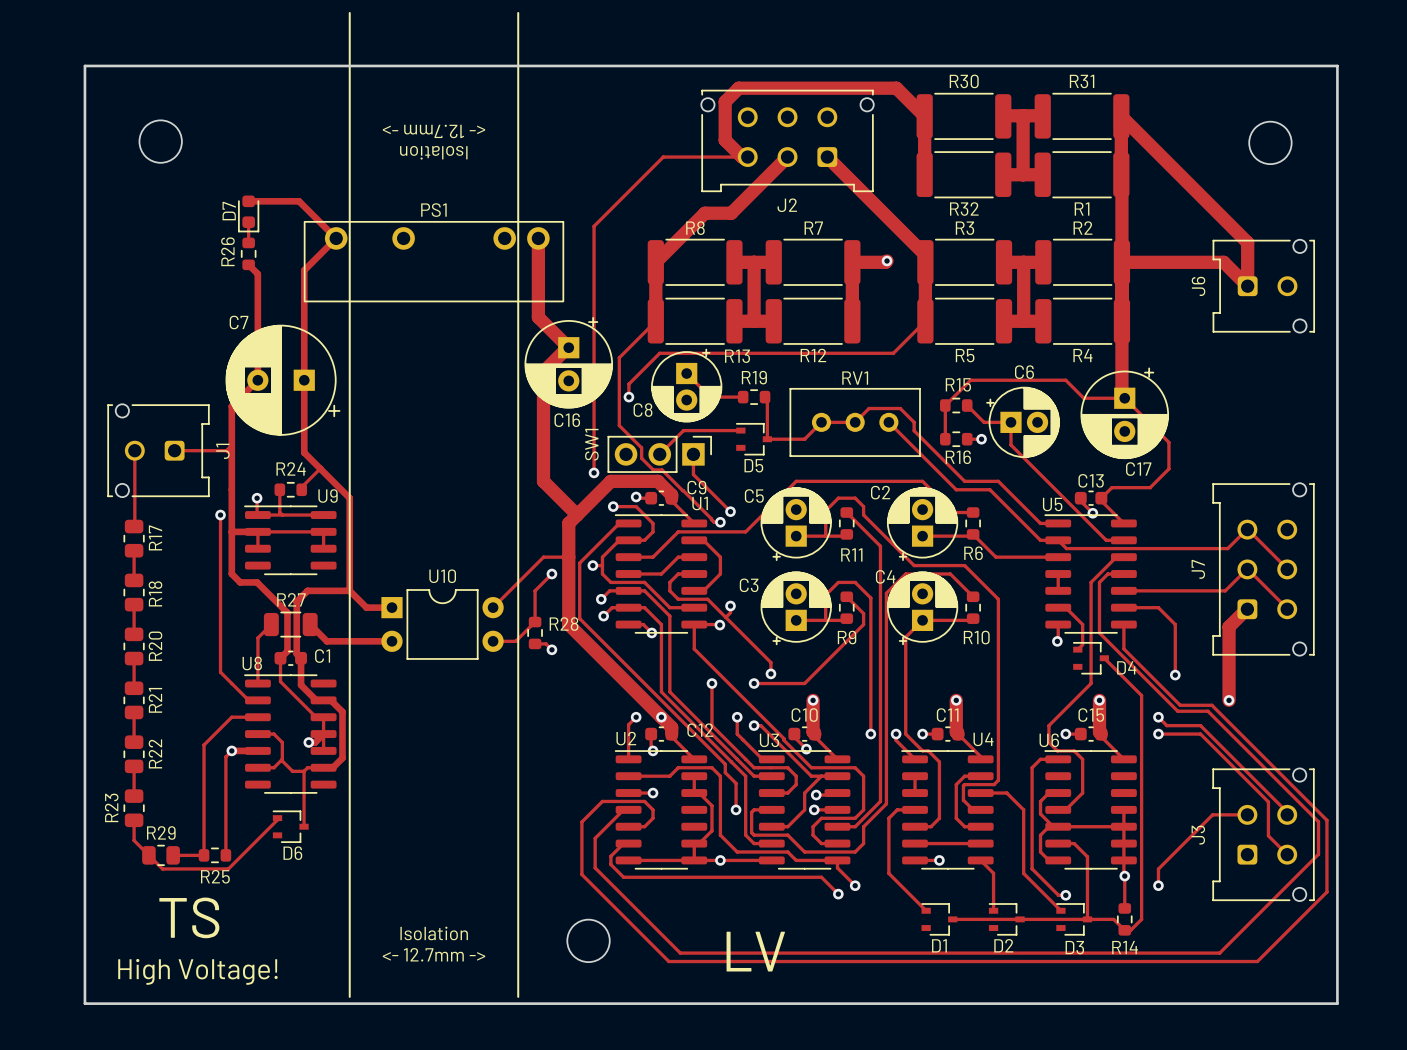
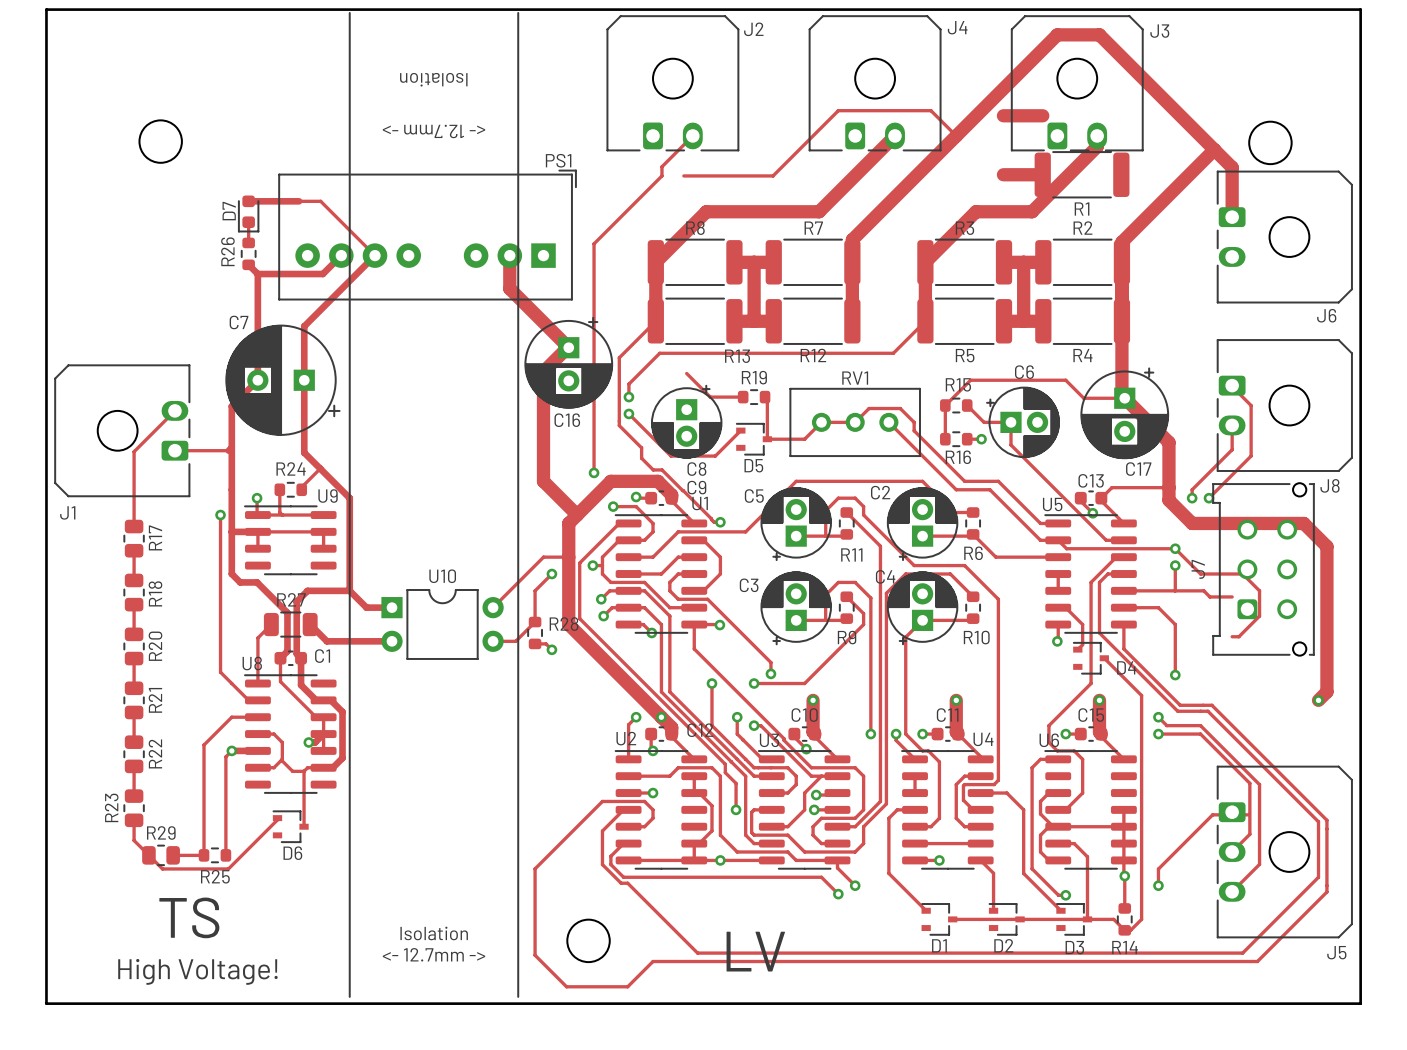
J4: none -> (875, 83)
J2 footprint: [701, 89, 874, 193] -> [606, 15, 740, 152]
track: (1023, 115) (1023, 174) -> none
R30: (963, 116) -> none
R31: (1082, 116) -> none
track: none -> (956, 135) (931, 110) (838, 110) (773, 175) (683, 175)
text position: Isolation (433, 152) -> Isolation (433, 79)
track: (787, 157) (731, 213) (704, 213) -> (894, 135) (819, 211) (704, 213)
track: (827, 157) (925, 255) (925, 262) -> (1097, 135) (1097, 146) (1032, 211) (975, 211) (925, 262)
track: (924, 174) (924, 116) (896, 88) (738, 88) (725, 101) (725, 140) (741, 157) (747, 157) (663, 157) (594, 226) (594, 243) -> (692, 135) (661, 166) (661, 175) (594, 243)
R32: (963, 174) -> none
track: (299, 201) (336, 238) (304, 270) (304, 326) -> (299, 201) (320, 201) (375, 255) (304, 326)
J2 name position: J2 (787, 205) -> J2 (753, 29)
PS1 name position: PS1 (433, 210) -> PS1 (558, 160)
PS1 footprint: [303, 221, 565, 303] -> [278, 169, 577, 301]
track: (538, 238) (538, 317) -> (509, 255) (509, 288) (538, 317)
J6 footprint: [1212, 239, 1315, 333] -> [1216, 170, 1353, 304]
track: (1121, 242) (1121, 116) (1247, 242) (1247, 286) (1223, 262) (1121, 262) -> (1121, 242) (1214, 149)
track: none -> (341, 255) (322, 274) (257, 274)
track: (887, 260) (852, 262) -> (1232, 217) (1232, 167) (1099, 34) (1057, 34) (852, 239) (852, 262)
via: (887, 260) -> none
J6 name position: J6 (1198, 286) -> J6 (1326, 315)
C8 position: (686, 385) -> (686, 421)
track: none -> (1232, 385) (1251, 405) (1251, 456) (1209, 498)
track width: thin (1124, 398) (1168, 442) (1168, 468) -> thick (1124, 398) (1168, 442) (1168, 468)
J1 footprint: [107, 404, 210, 498] -> [54, 364, 191, 498]
J8: none -> (1284, 405)
C8 name position: C8 (643, 410) -> C8 (696, 469)
via: none -> (628, 413)
track: none -> (1232, 425) (1232, 449) (1192, 489) (1192, 498)
track: (740, 430) (683, 430) (659, 454) -> (740, 430) (715, 456) (671, 456) (628, 413)
track: (134, 450) (134, 526) -> (174, 410) (134, 451) (134, 526)
J1 name position: J1 (222, 451) -> J1 (67, 512)
SW1: (659, 454) -> none
track: (693, 454) (693, 474) (730, 511) -> none
track: (1168, 468) (1150, 487) -> (1168, 487) (1150, 487)
track: none -> (1168, 468) (1168, 500) (1192, 523) (1303, 523) (1326, 546) (1326, 691) (1318, 700)
via: none -> (1192, 498)
via: none -> (1209, 498)
via: (730, 511) -> none
track: (1066, 548) (1227, 548) (1247, 528) (1287, 568) -> (1066, 548) (1175, 548) (1200, 574) (1242, 574) (1259, 590) (1259, 616) (1238, 636) (1232, 636)
via: none -> (1175, 548)
track: none -> (1175, 565) (1175, 590)
via: none -> (1175, 565)
track: (1203, 590) (1225, 590) (1247, 568) (1287, 608) -> (1203, 590) (1209, 596) (1232, 596)
track: (730, 606) (730, 612) (725, 617) -> none
via: (730, 606) -> none
track: (1247, 608) (1229, 626) (1229, 700) -> none
via: (1229, 700) -> none
via: none -> (1318, 700)
J3 footprint: [1212, 768, 1315, 902] -> [1011, 15, 1144, 152]
track: (1249, 783) (1268, 801) (1268, 835) (1287, 854) -> (1249, 783) (1249, 834) (1232, 852)
track: (1259, 784) (1287, 812) (1287, 814) -> (1259, 784) (1259, 864) (1232, 891)
track: (581, 822) (581, 874) (668, 961) -> (581, 822) (535, 868) (535, 955) (566, 986) (627, 986) (653, 961) (668, 961)
track: (602, 831) (595, 838) (595, 867) (680, 953) (697, 953) -> (602, 831) (602, 864) (621, 883) (627, 883) (697, 953)
J3 name position: J3 (1198, 835) -> J3 (1159, 31)
J5: none -> (1284, 852)
track: (1318, 854) (1219, 953) -> (1318, 854) (1318, 877) (1242, 953) (1219, 953)
board edge: (84, 1003) (84, 65) (1337, 65) (1337, 1003) -> (84, 1003) (46, 1003) (46, 9) (1360, 9) (1360, 1003) (1337, 1003)

